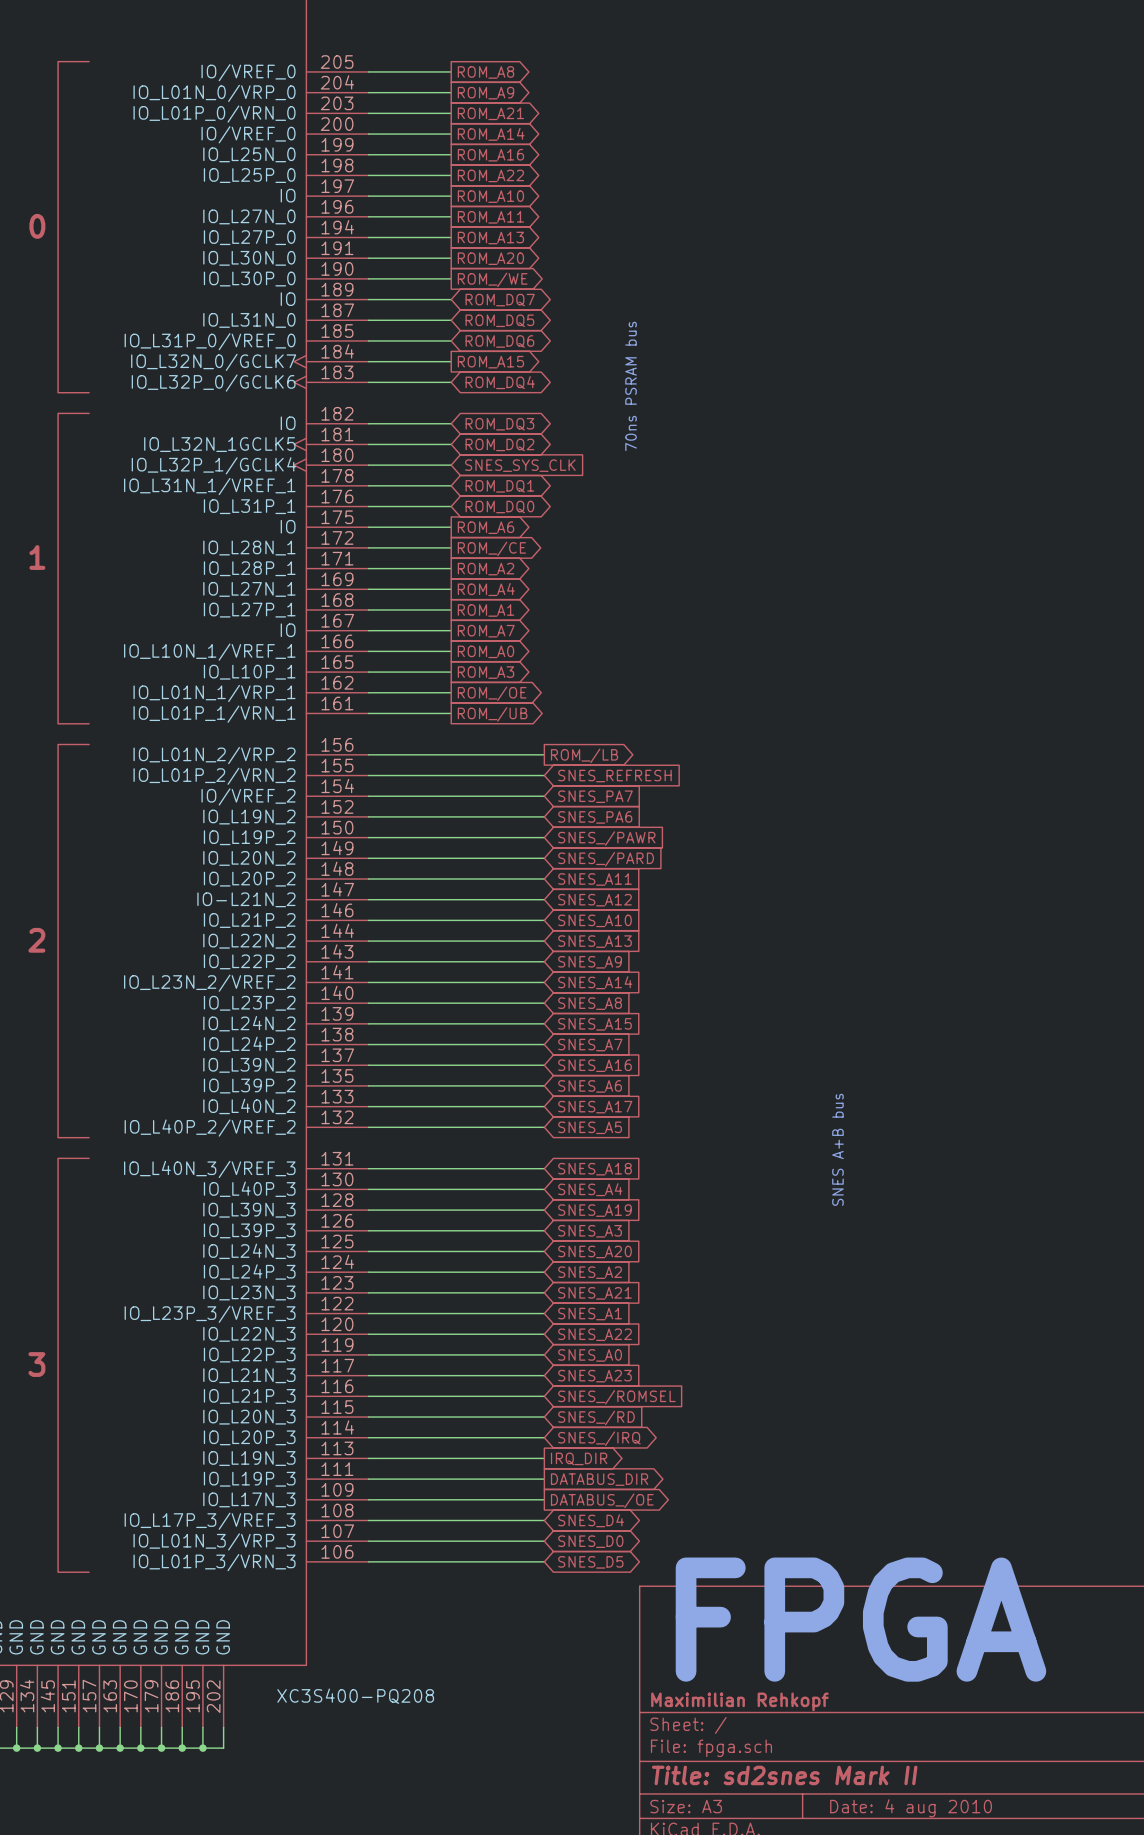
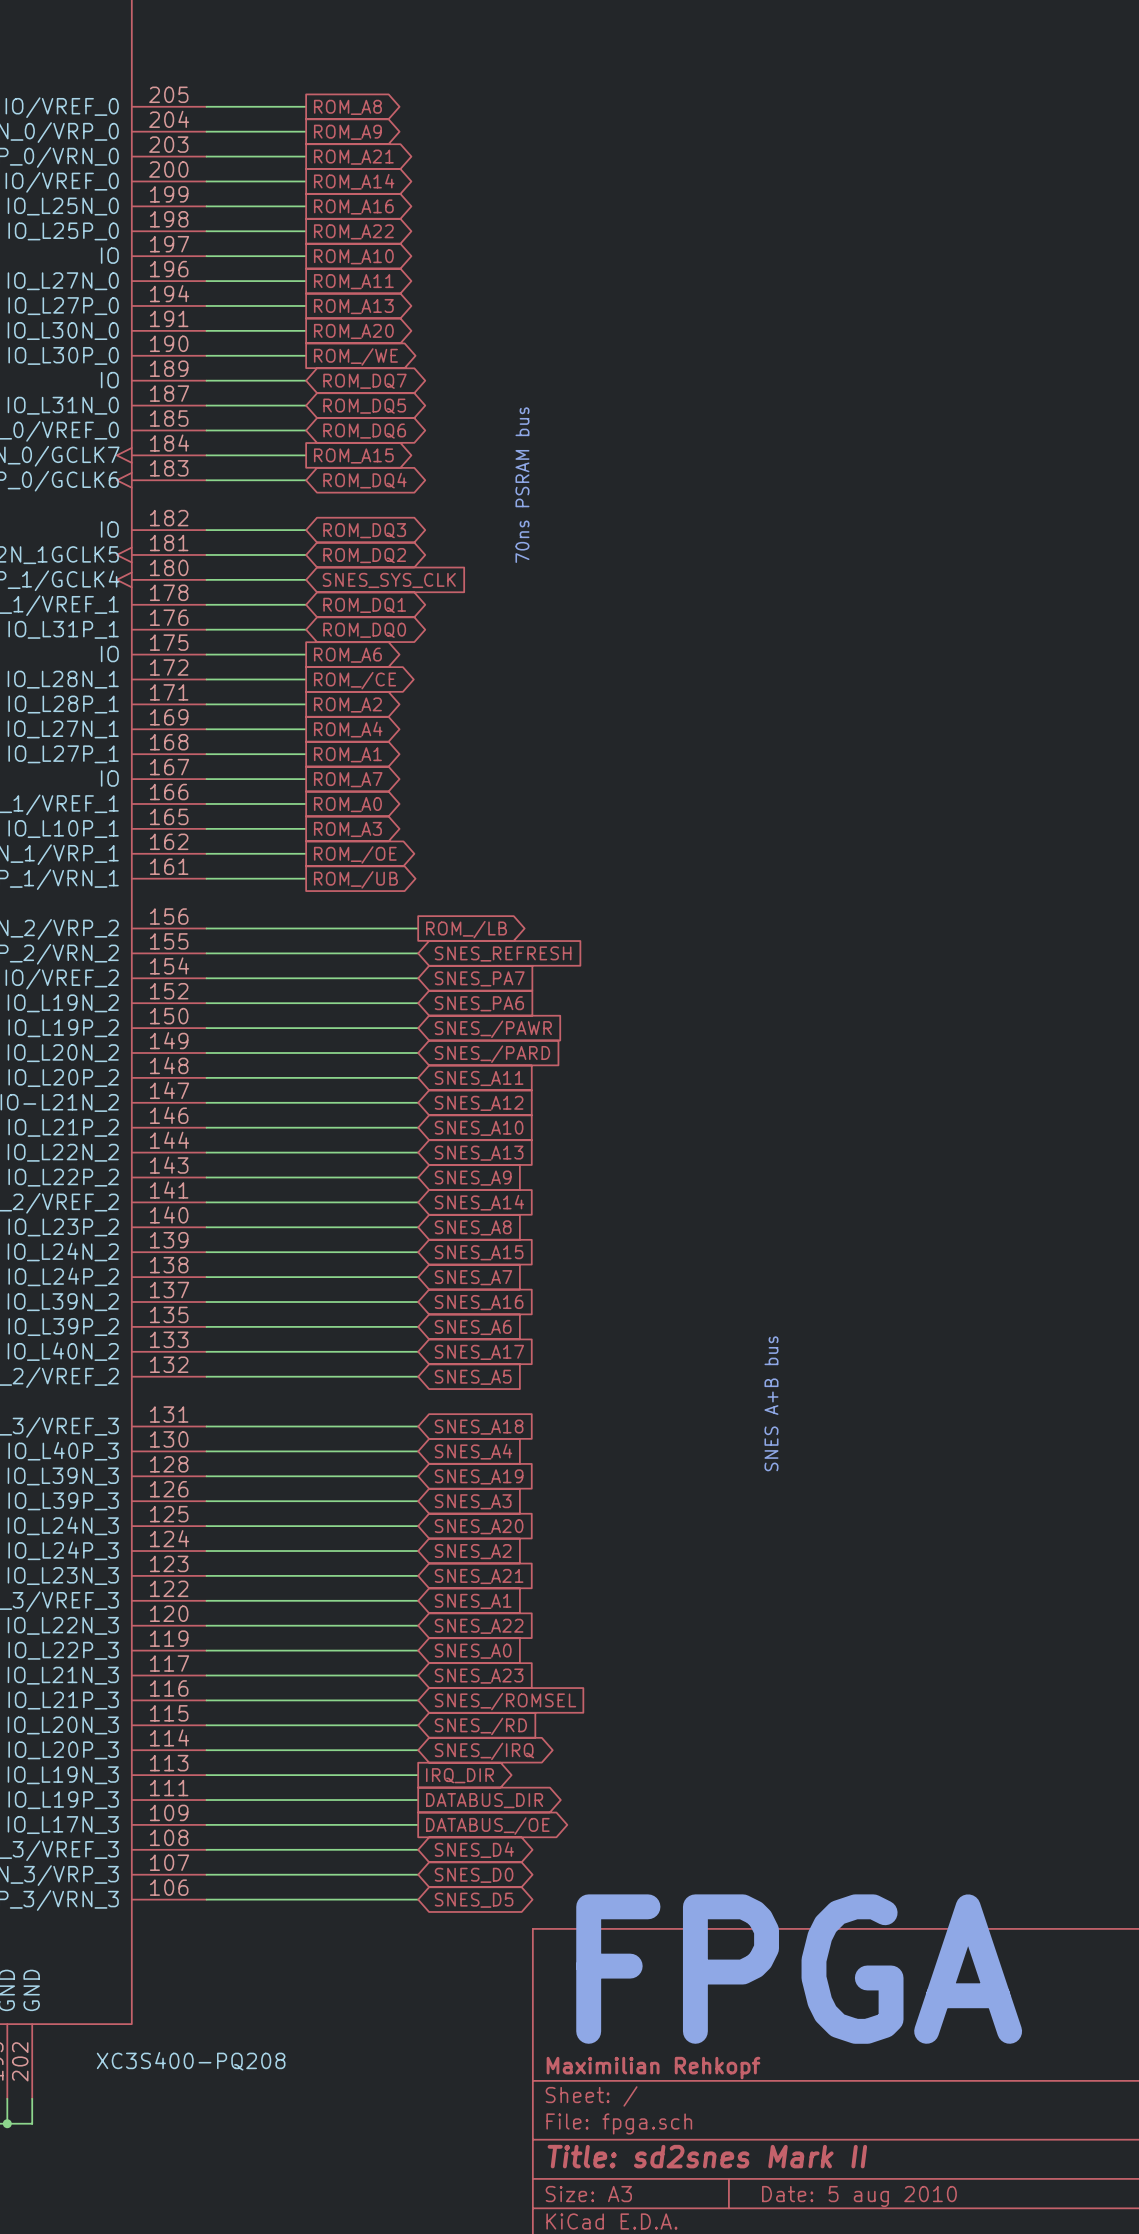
title block: Date: 4 aug 2010 (911, 1808) -> Date: 5 aug 2010 (859, 2196)

